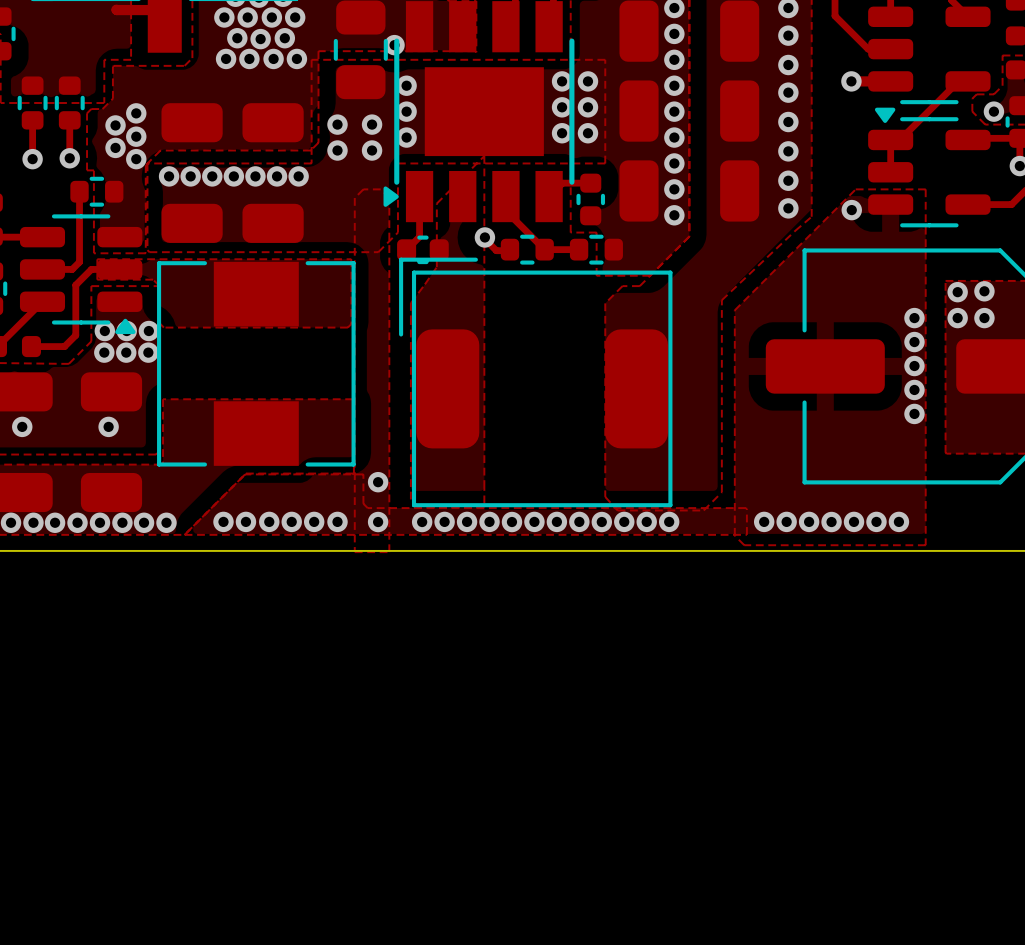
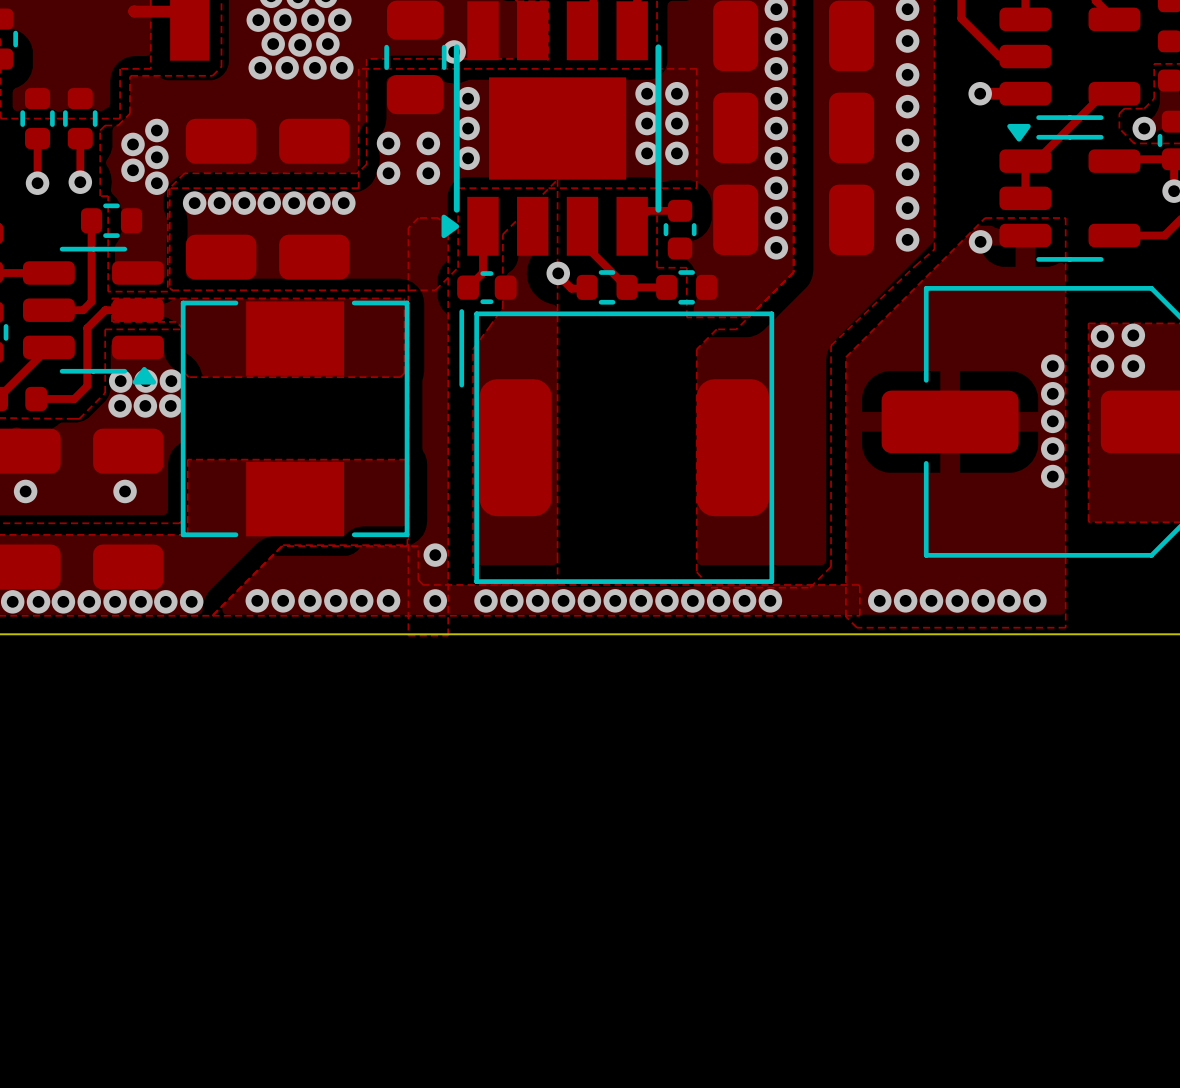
part footprint: [399, 257, 673, 508] -> [459, 309, 775, 584]

